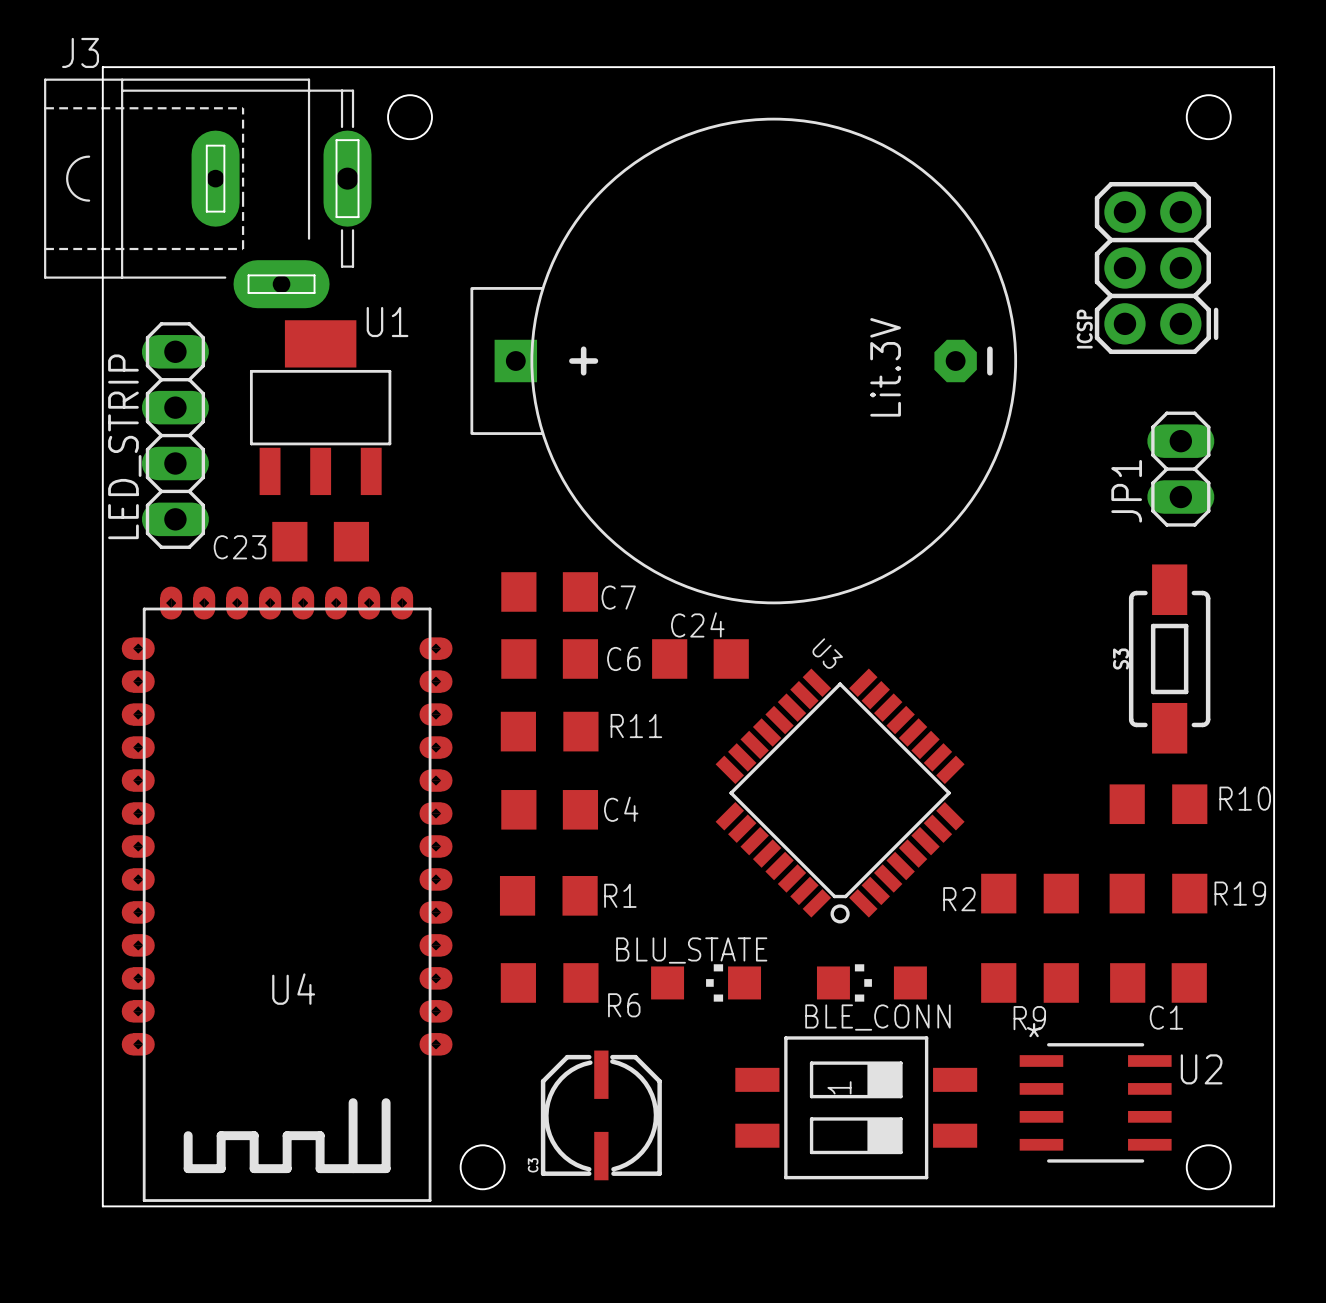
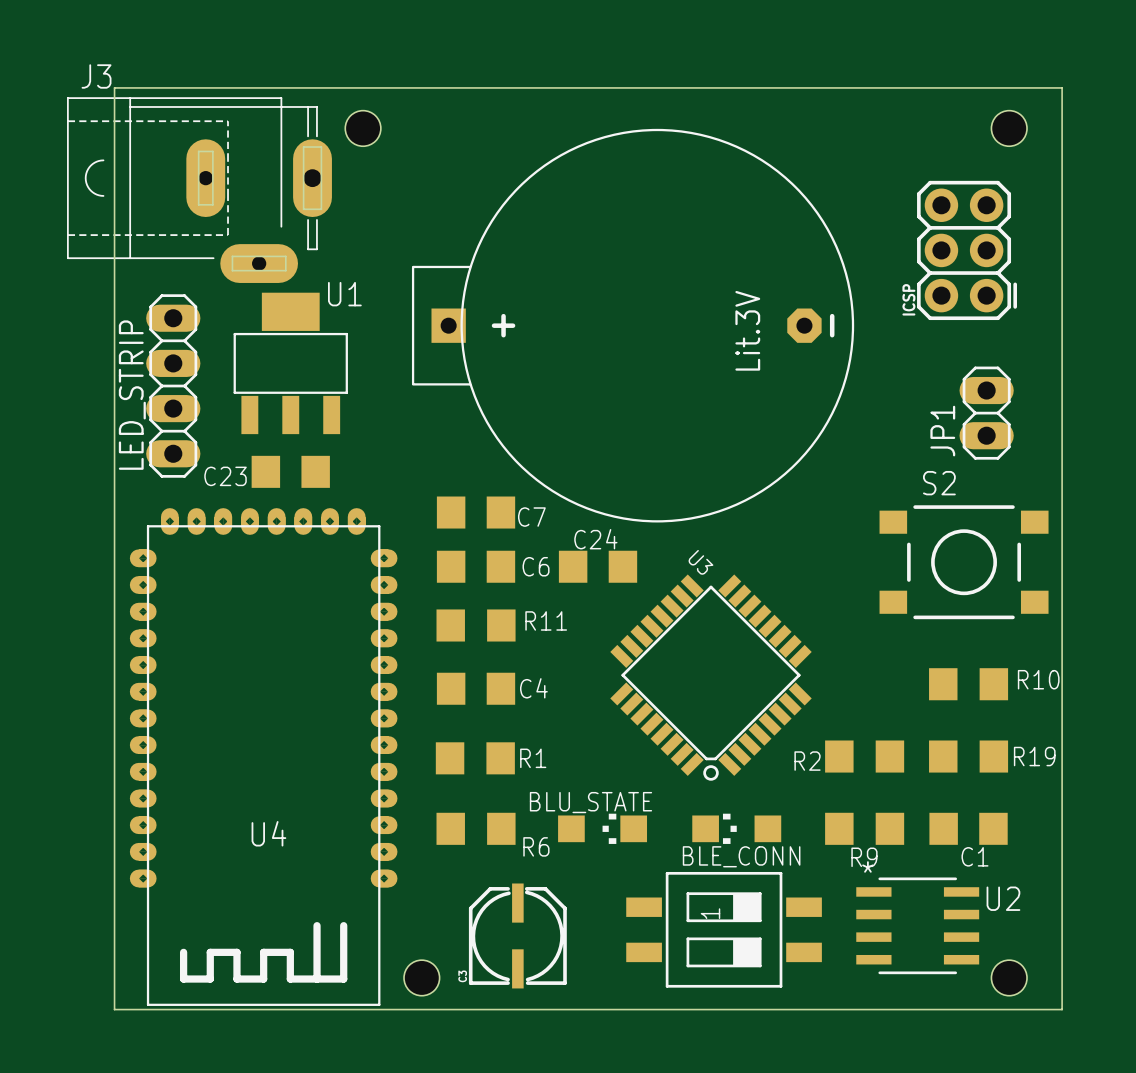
S2: none -> (964, 562)
S3: (1169, 658) -> none

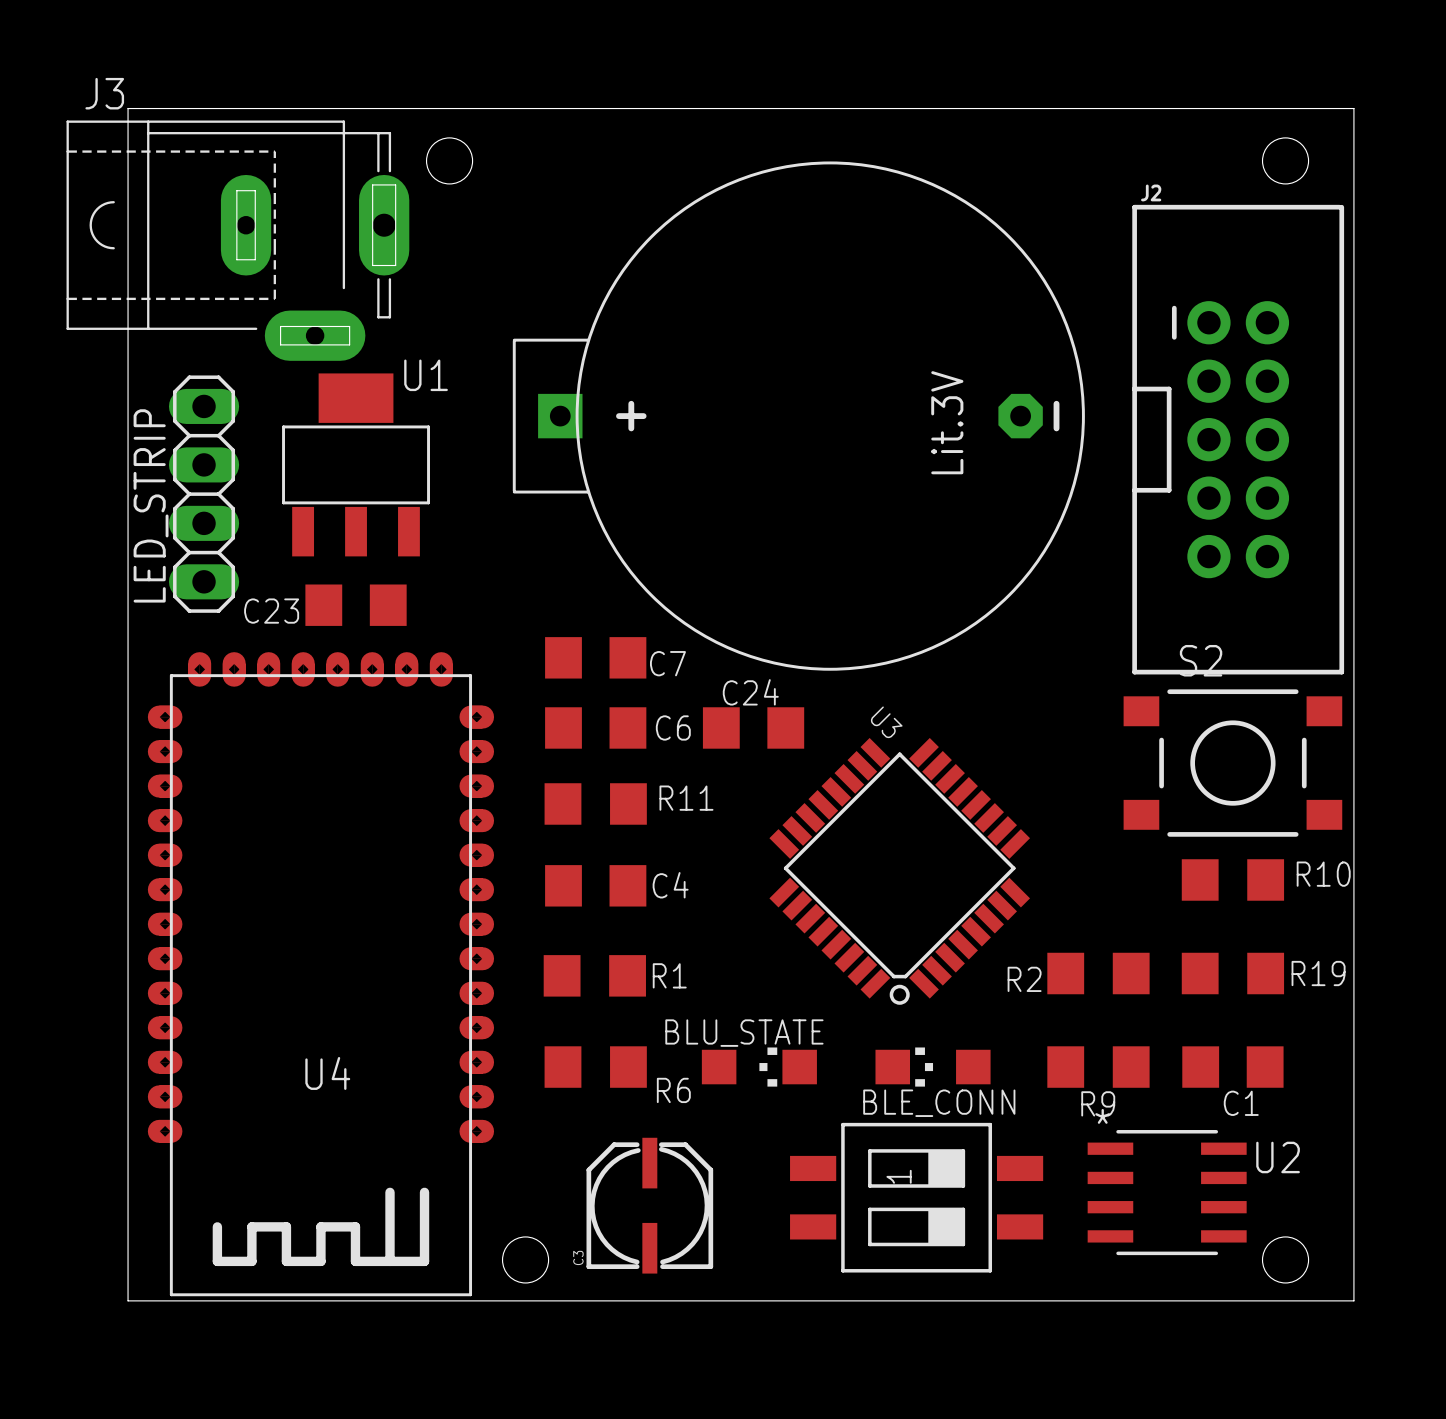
ICSP: (967, 250) -> none
J2: none -> (1238, 439)
JP1: (986, 413) -> none
S2 position: (964, 562) -> (1232, 763)

